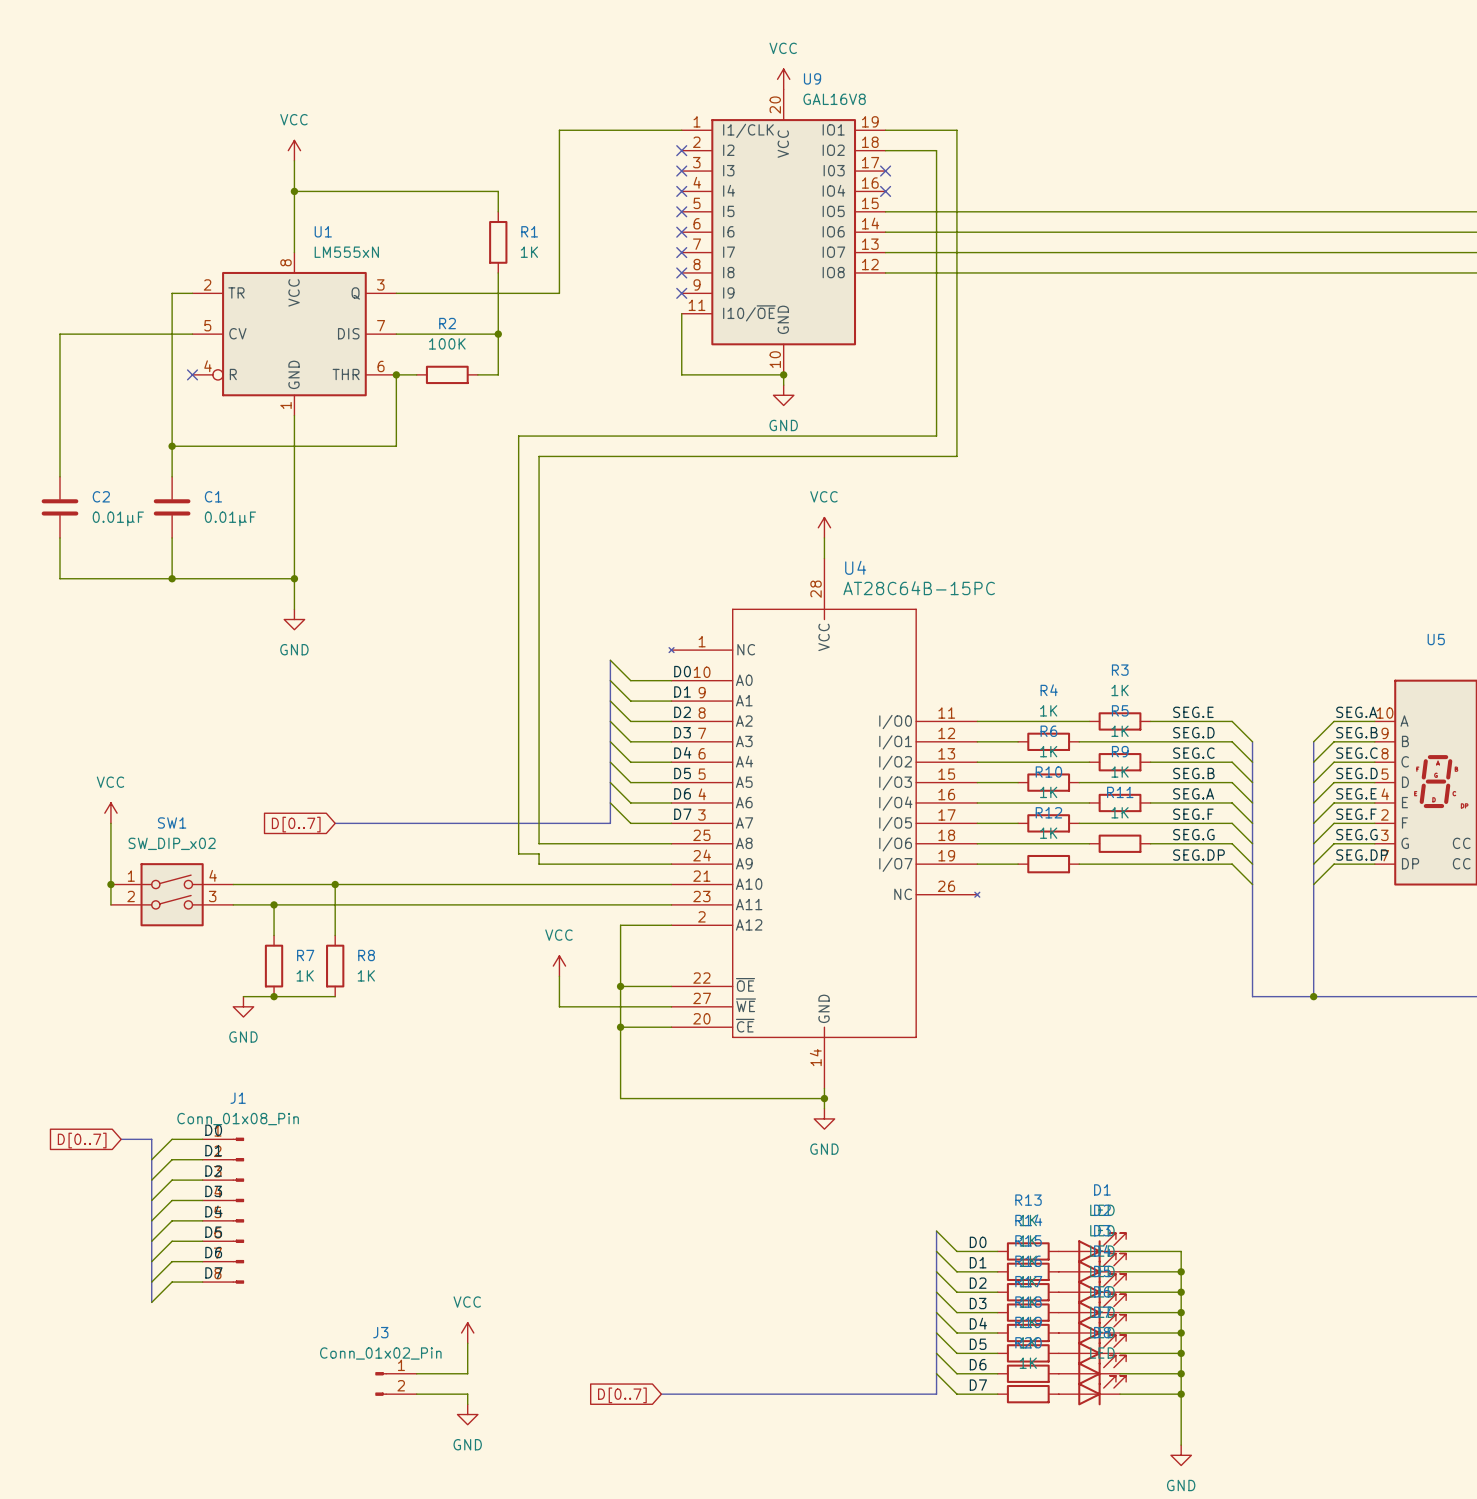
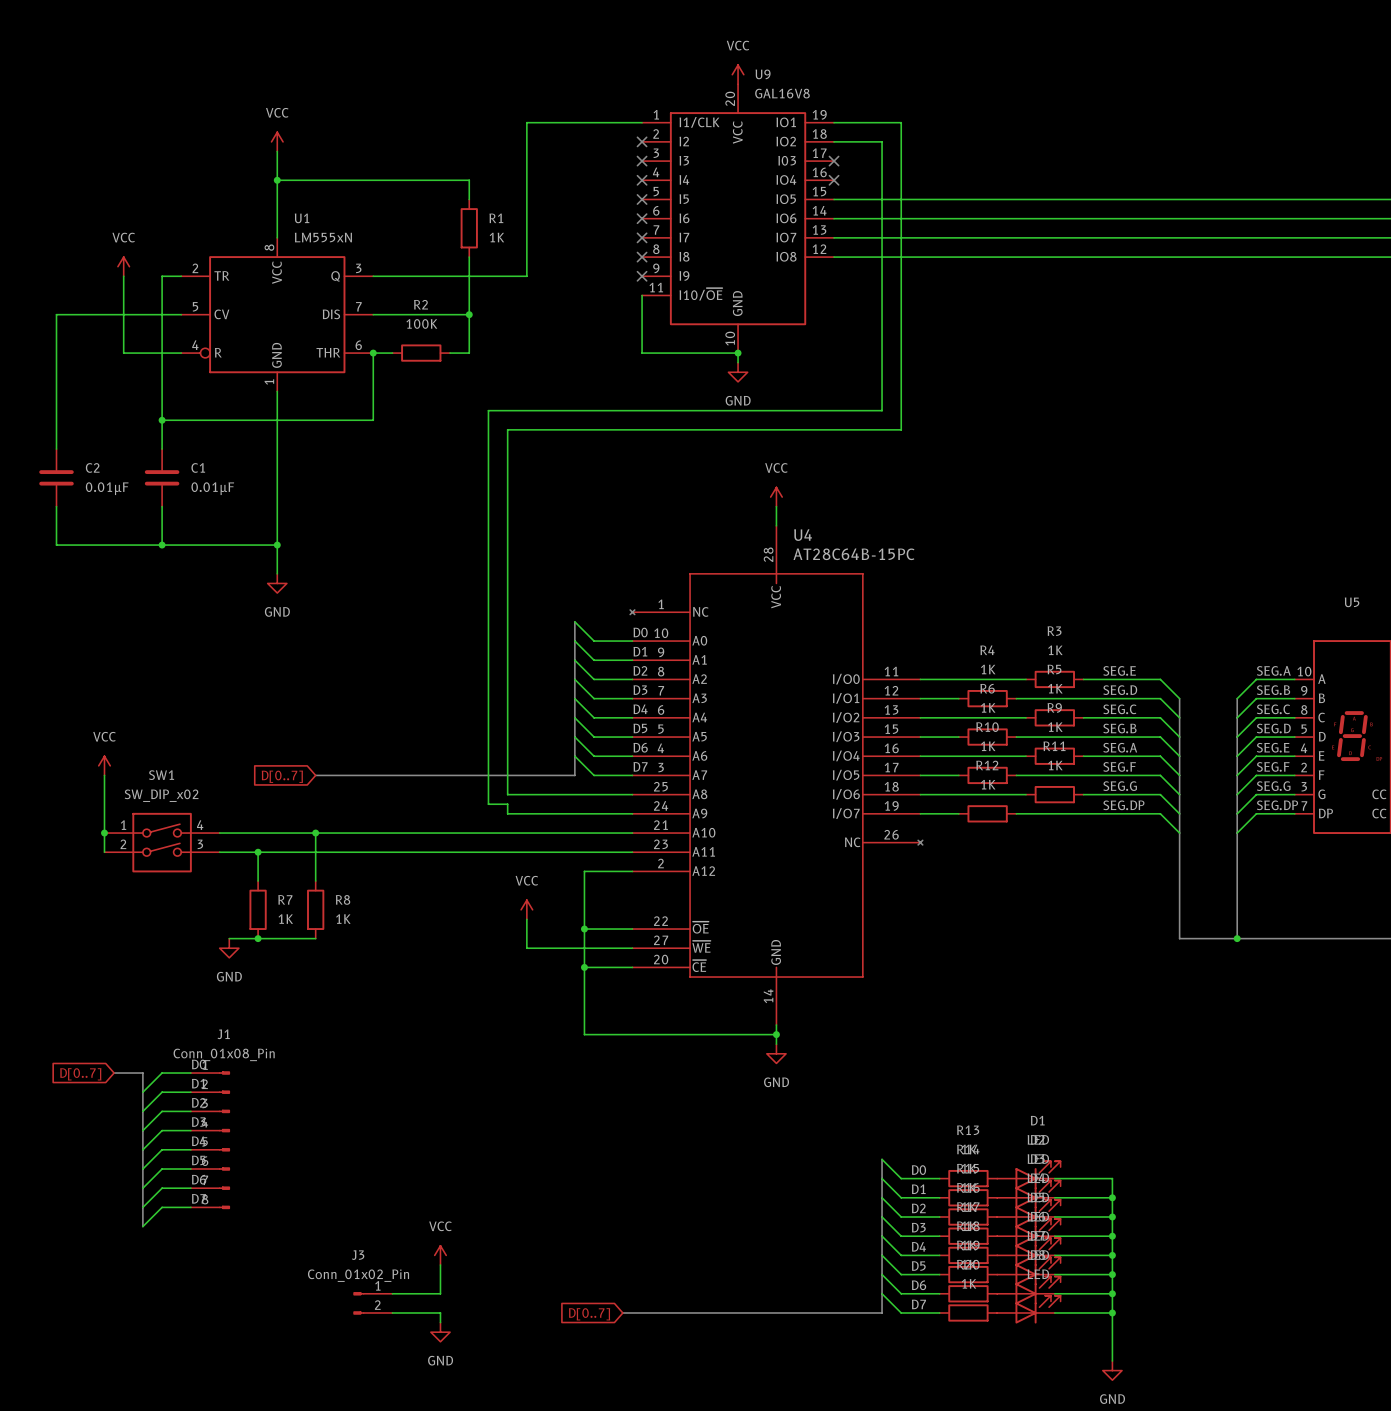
power symbol: none -> VCC (123, 266)
wire: none -> (123, 276) (123, 353) (181, 353)
no-connect mark: (192, 374) -> none

